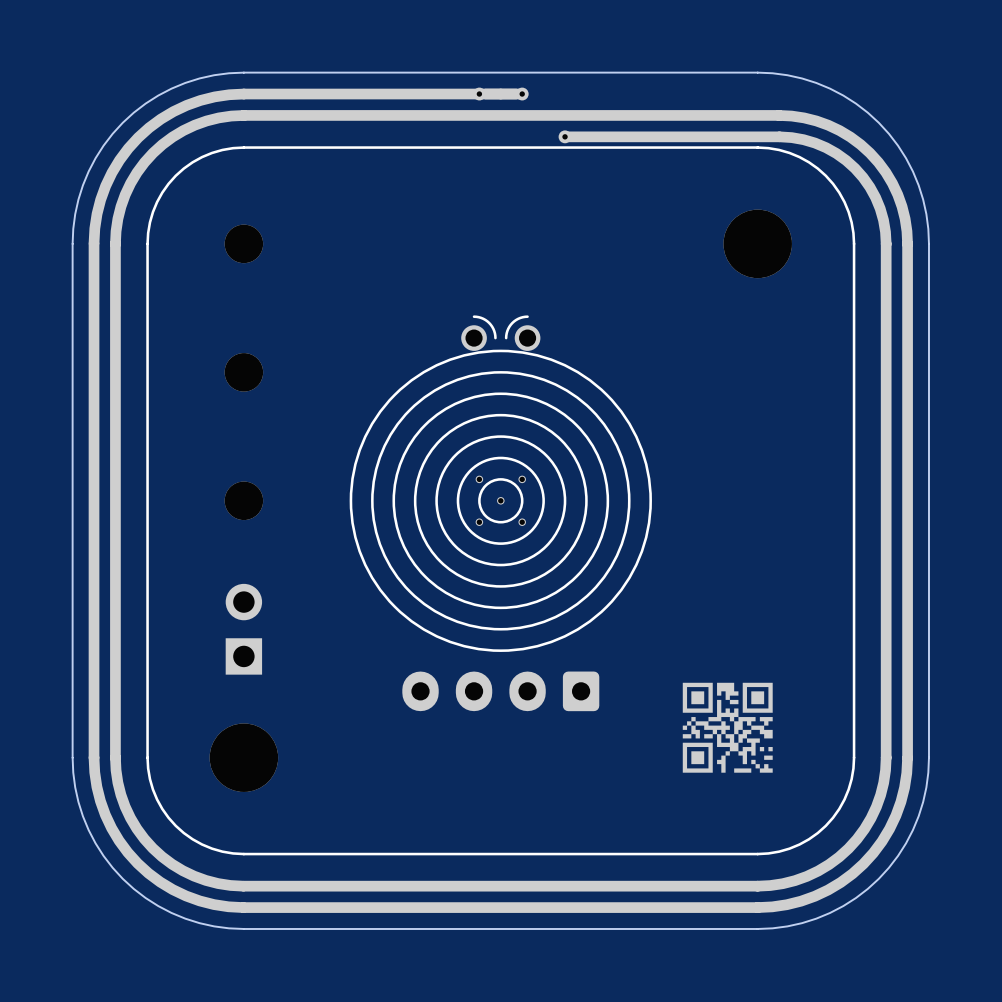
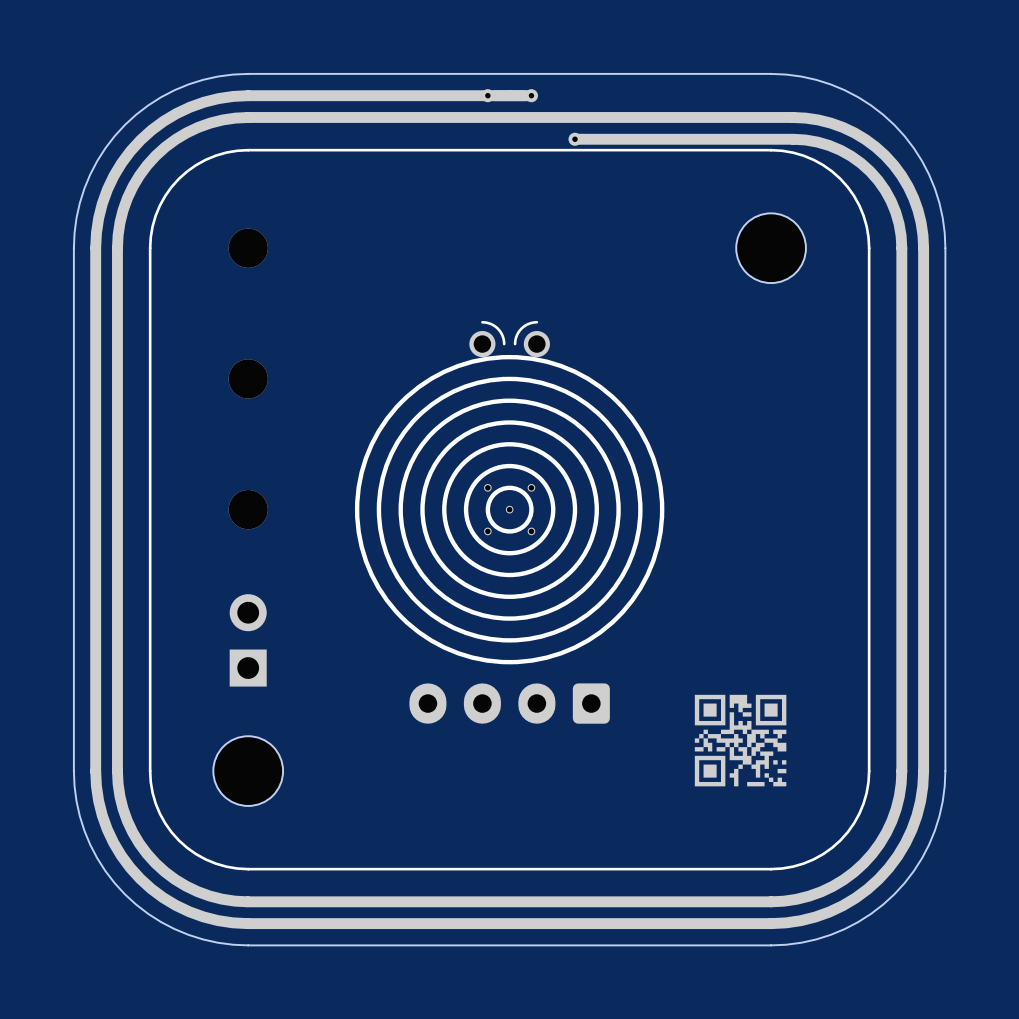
part footprint: [723, 209, 792, 279] -> [736, 213, 806, 284]
drawing: none -> [354, 354, 665, 665]
drawing: [349, 349, 652, 652] -> none
part footprint: [209, 723, 279, 792] -> [213, 736, 284, 806]

